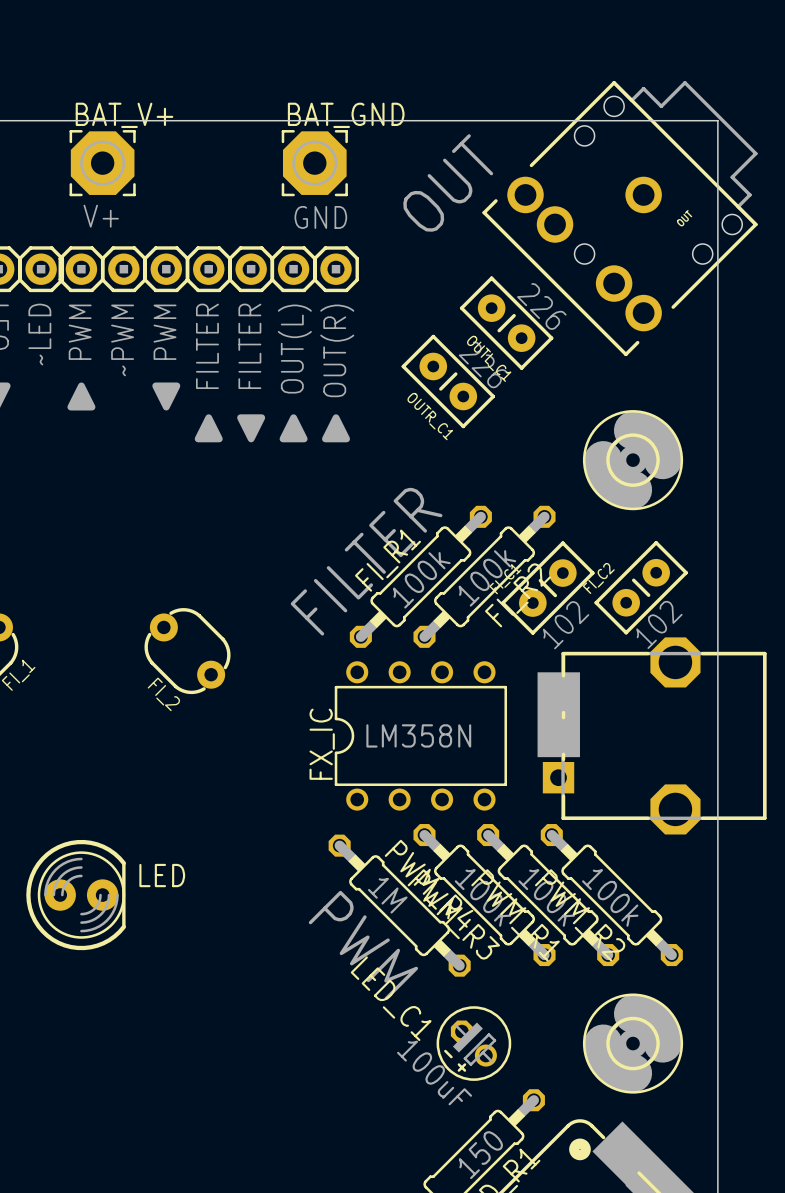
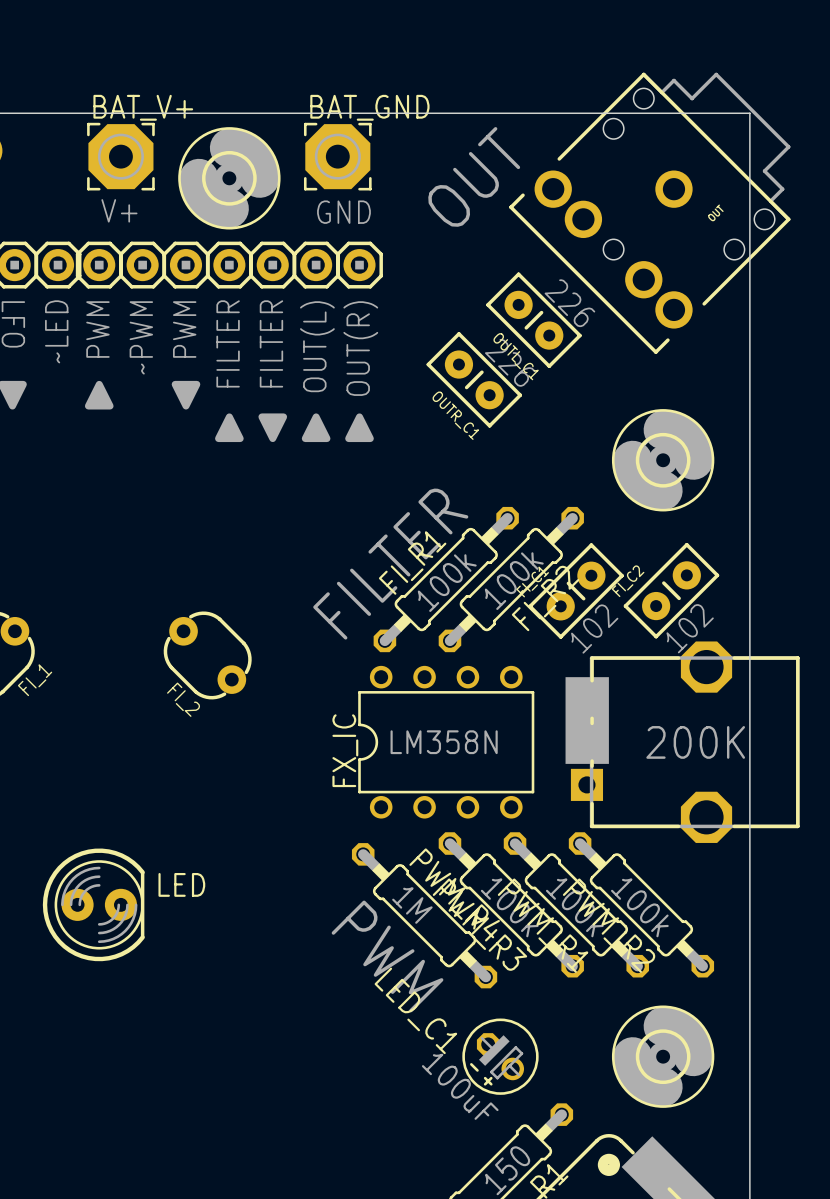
part: none -> (229, 178)
text: none -> 200K (695, 742)

